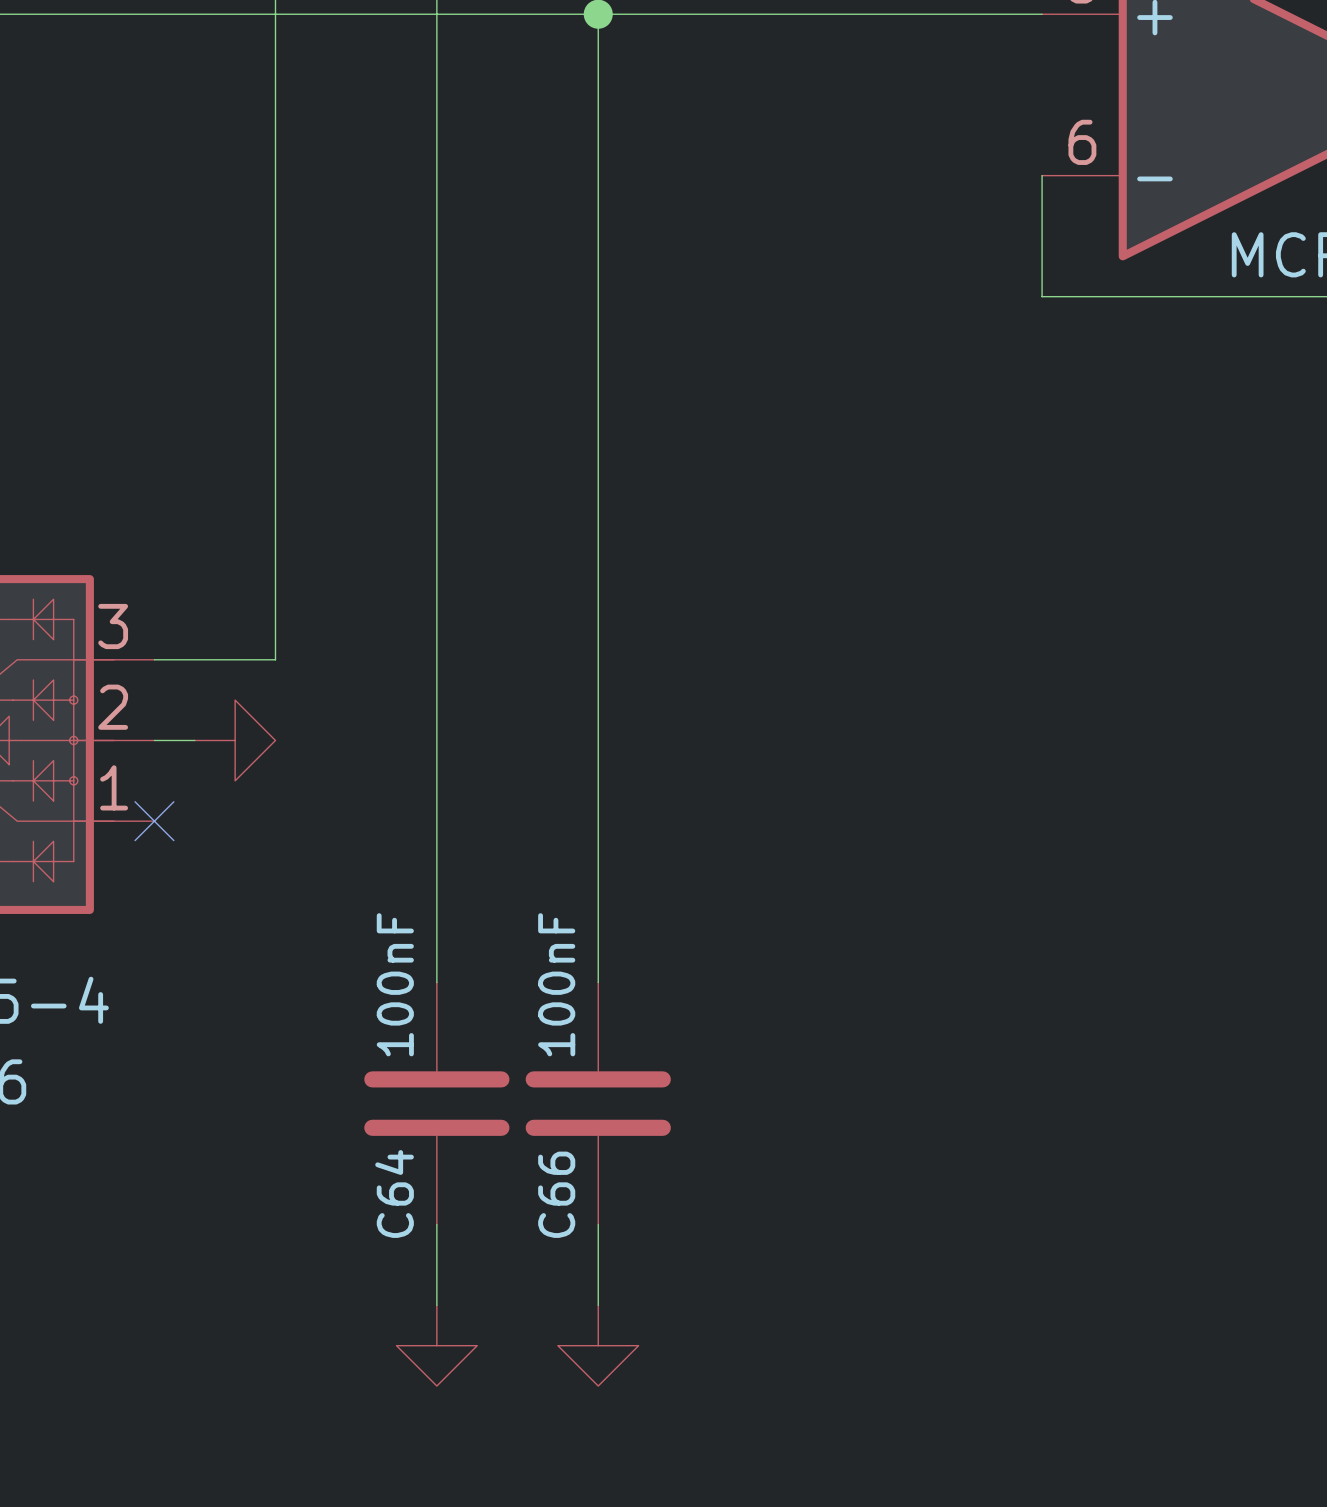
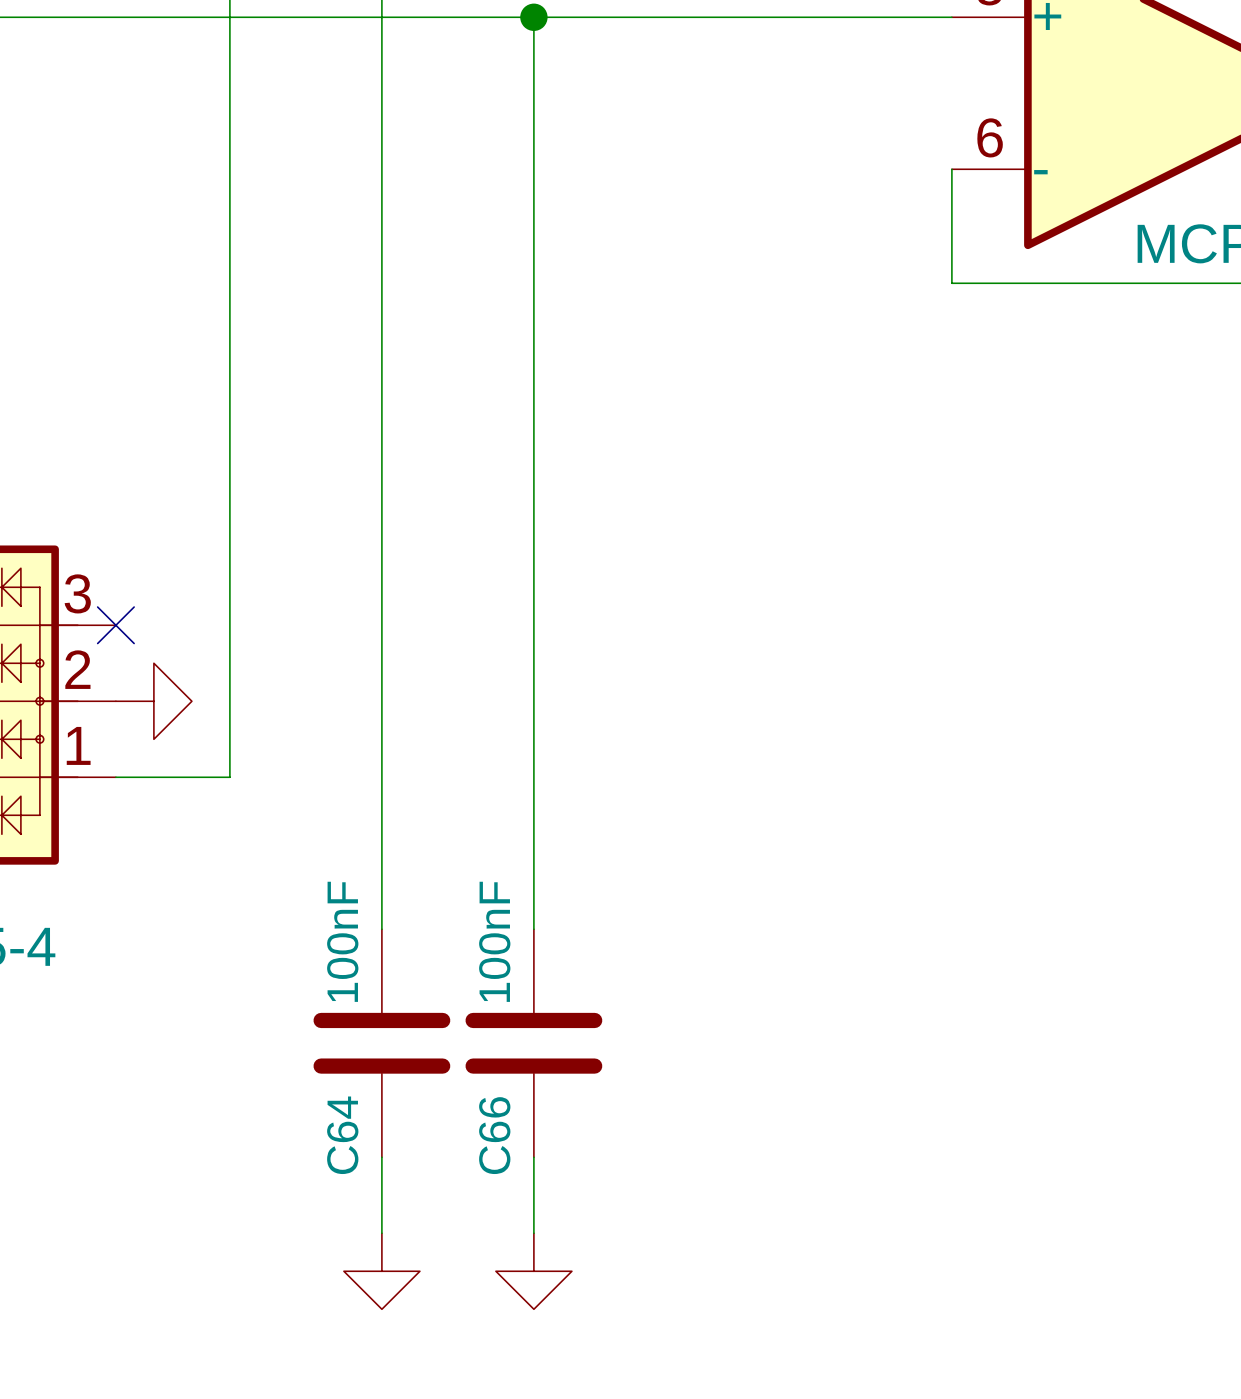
wire: (154, 659) (275, 659) -> (115, 777) (229, 777) (229, 625)
power symbol position: (235, 740) -> (153, 701)
no-connect mark position: (154, 821) -> (115, 625)

